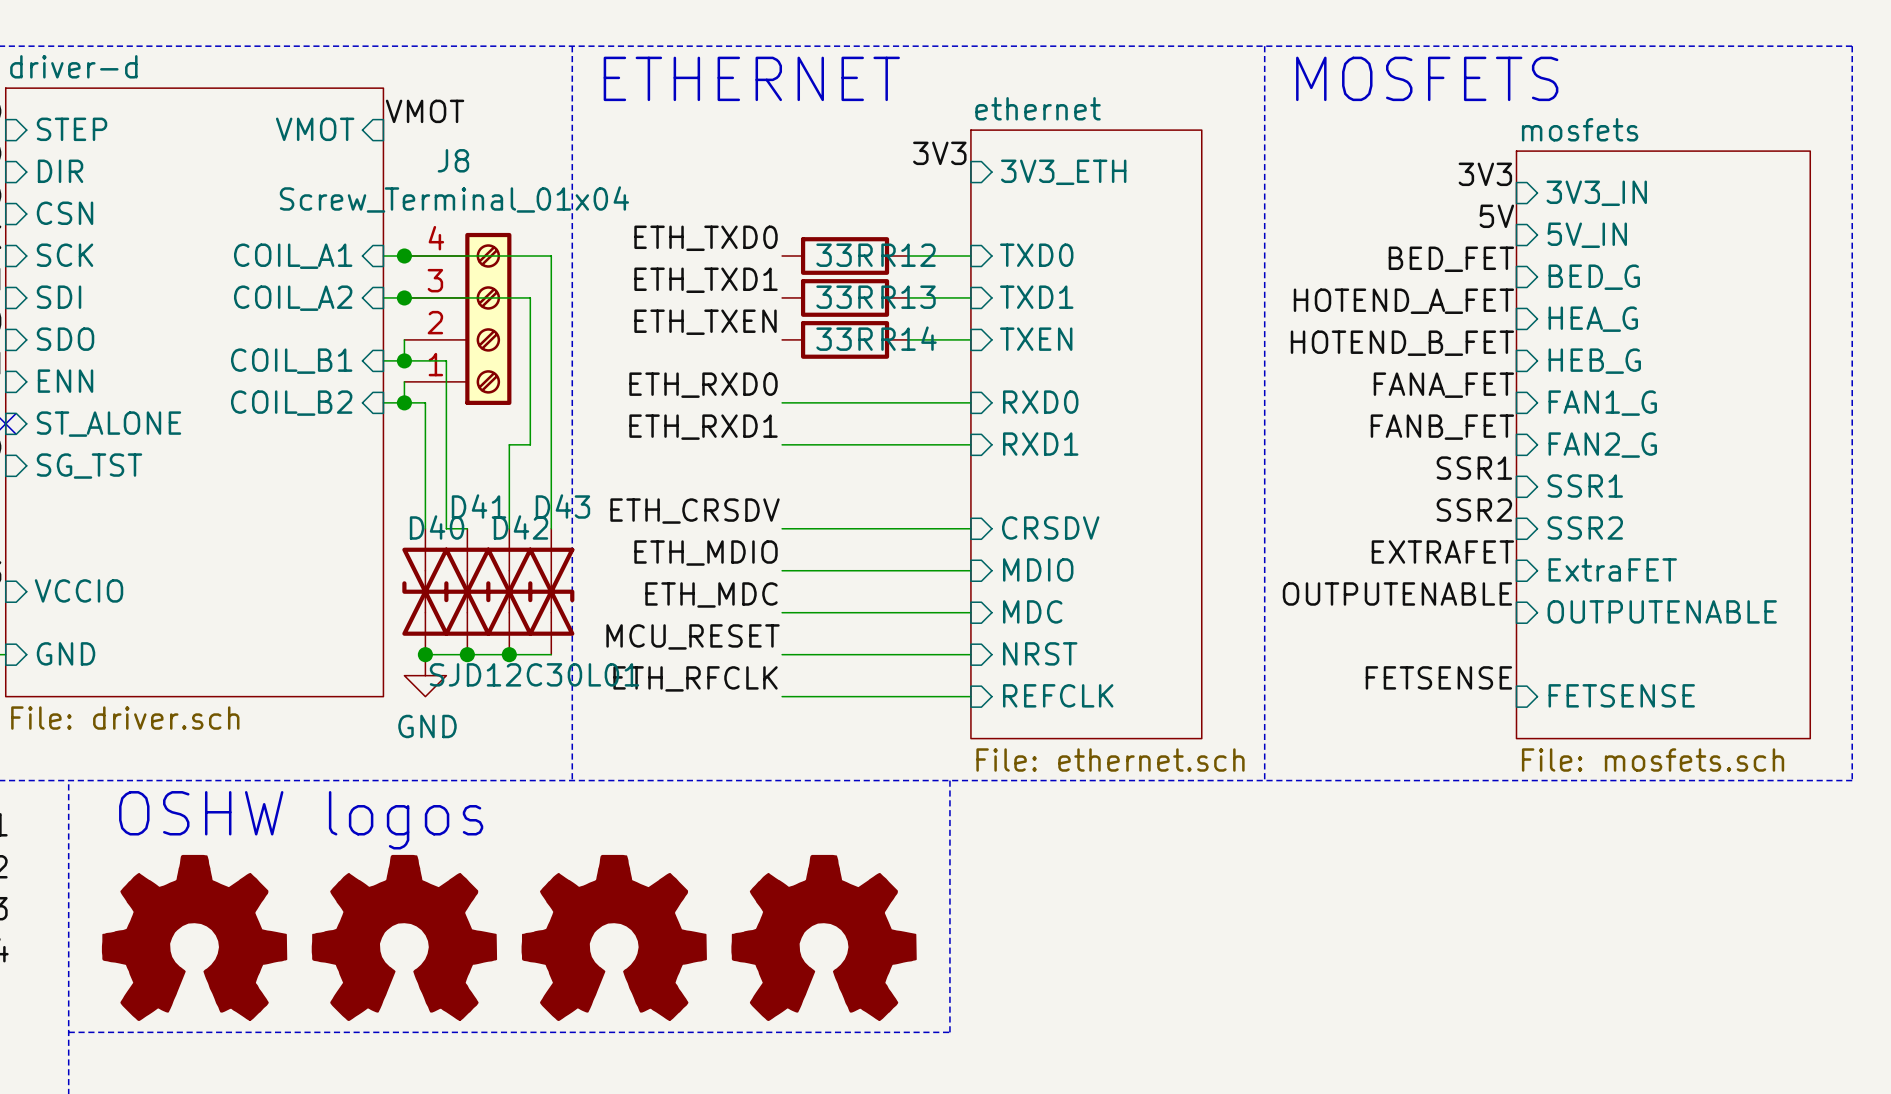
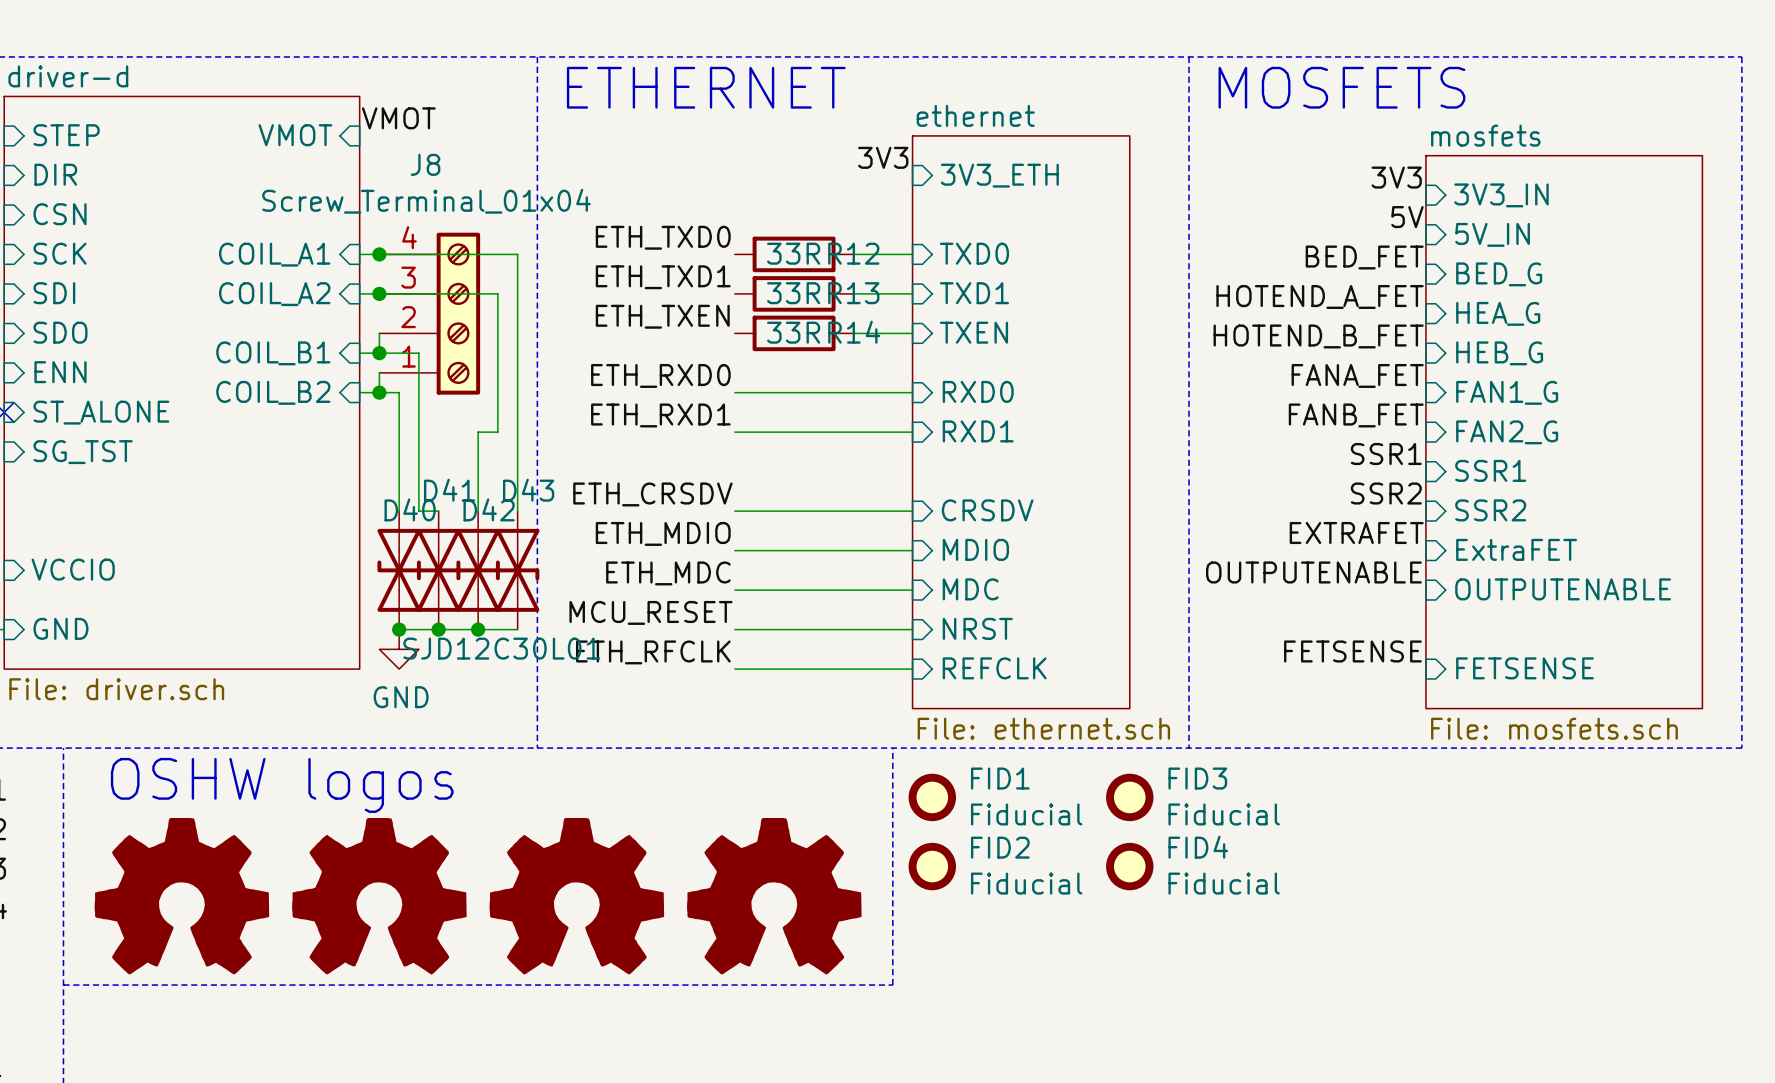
FID1: none -> Fiducial (932, 797)
FID3: none -> Fiducial (1129, 797)
FID2: none -> Fiducial (932, 866)
FID4: none -> Fiducial (1129, 866)

